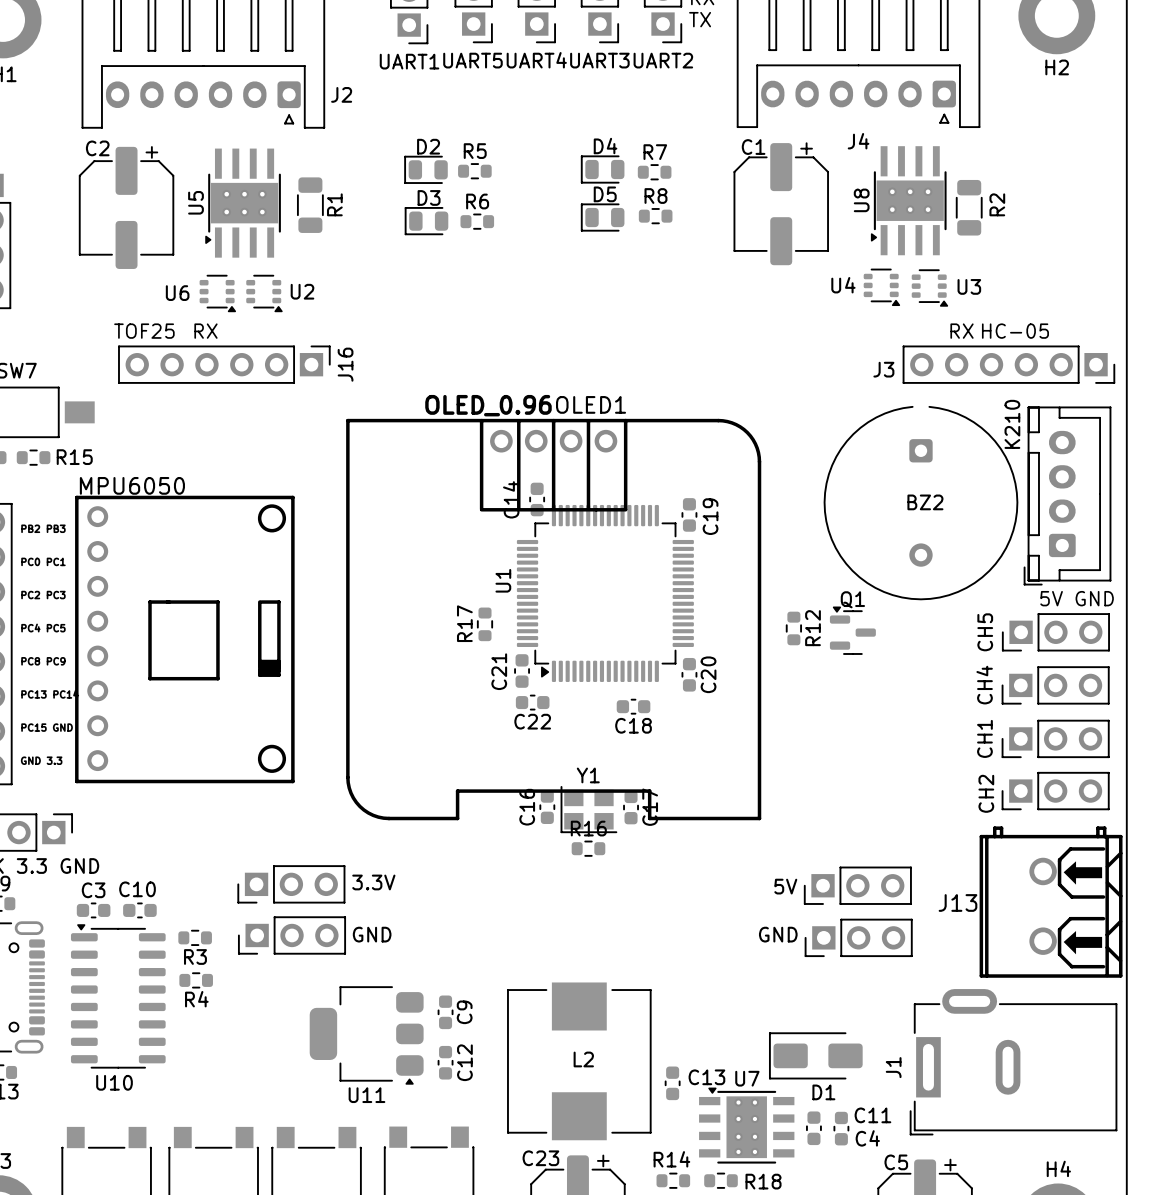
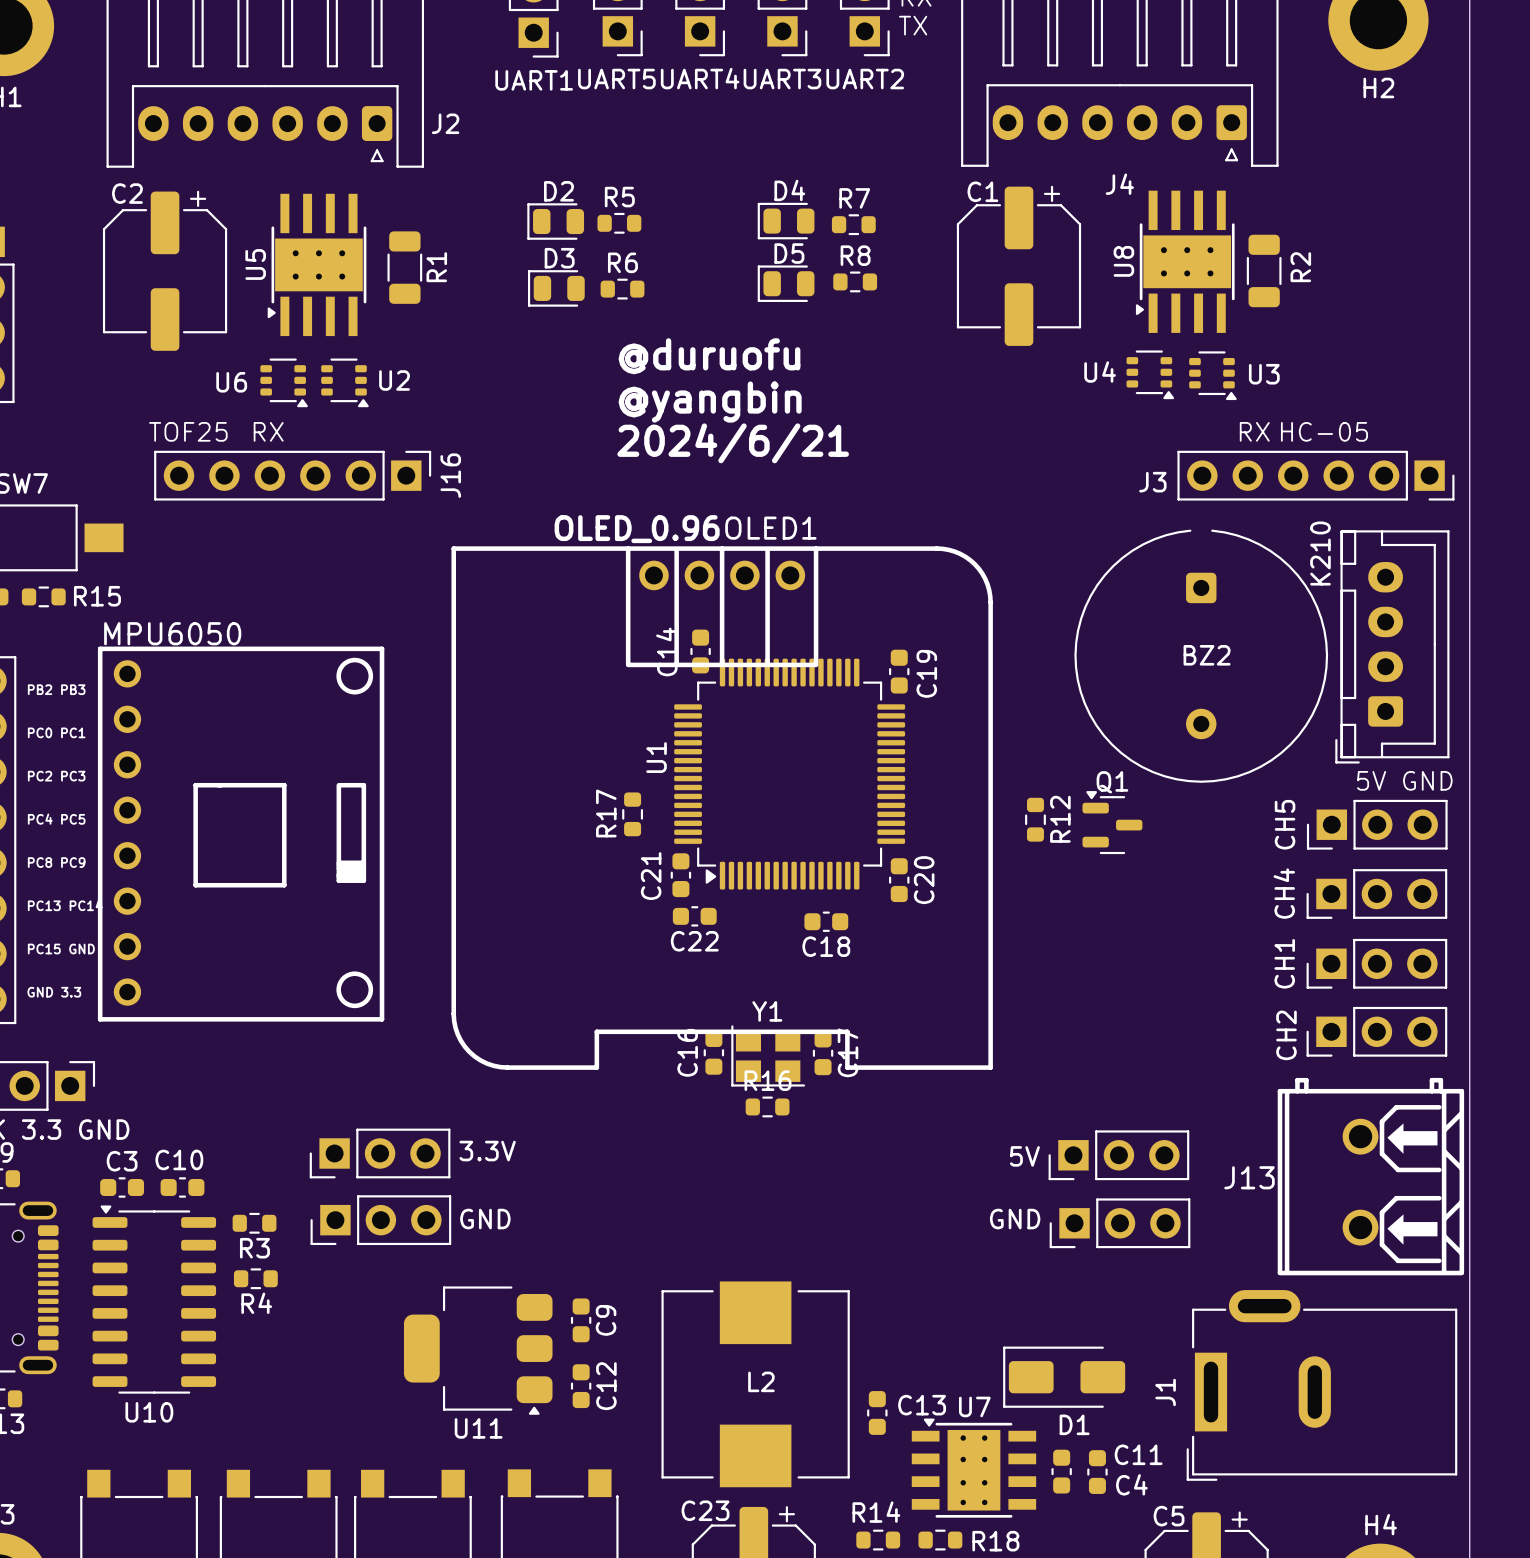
text: none -> @duruofu (709, 356)
text: none -> @yangbin (710, 402)
text: none -> 2024/6/21 (733, 443)

